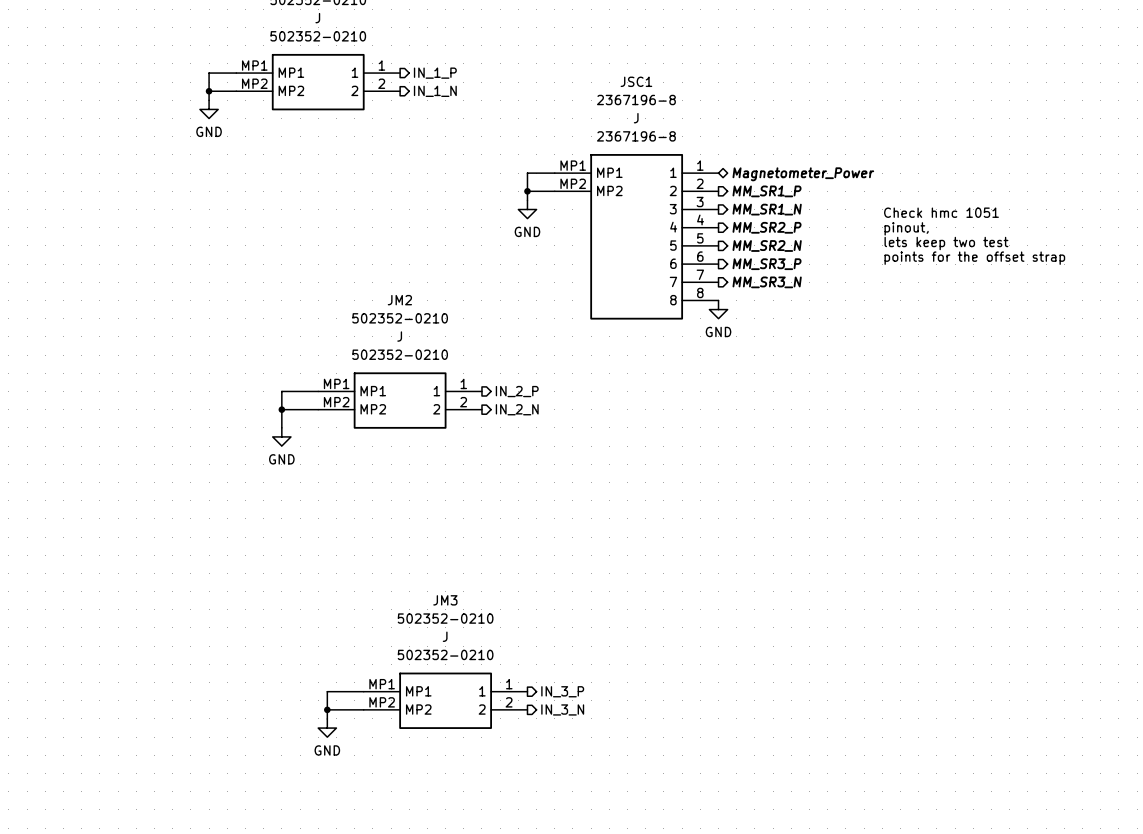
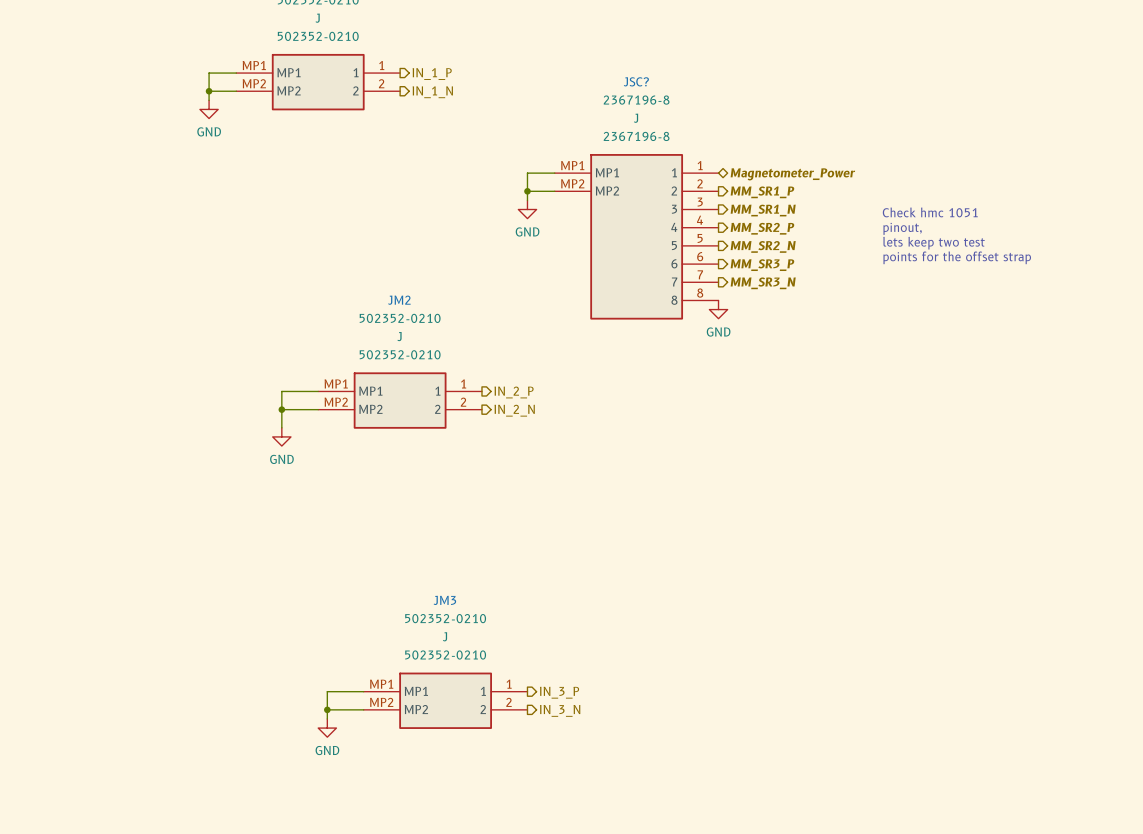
JSC1 name: JSC1 (636, 81) -> JSC? (636, 81)

